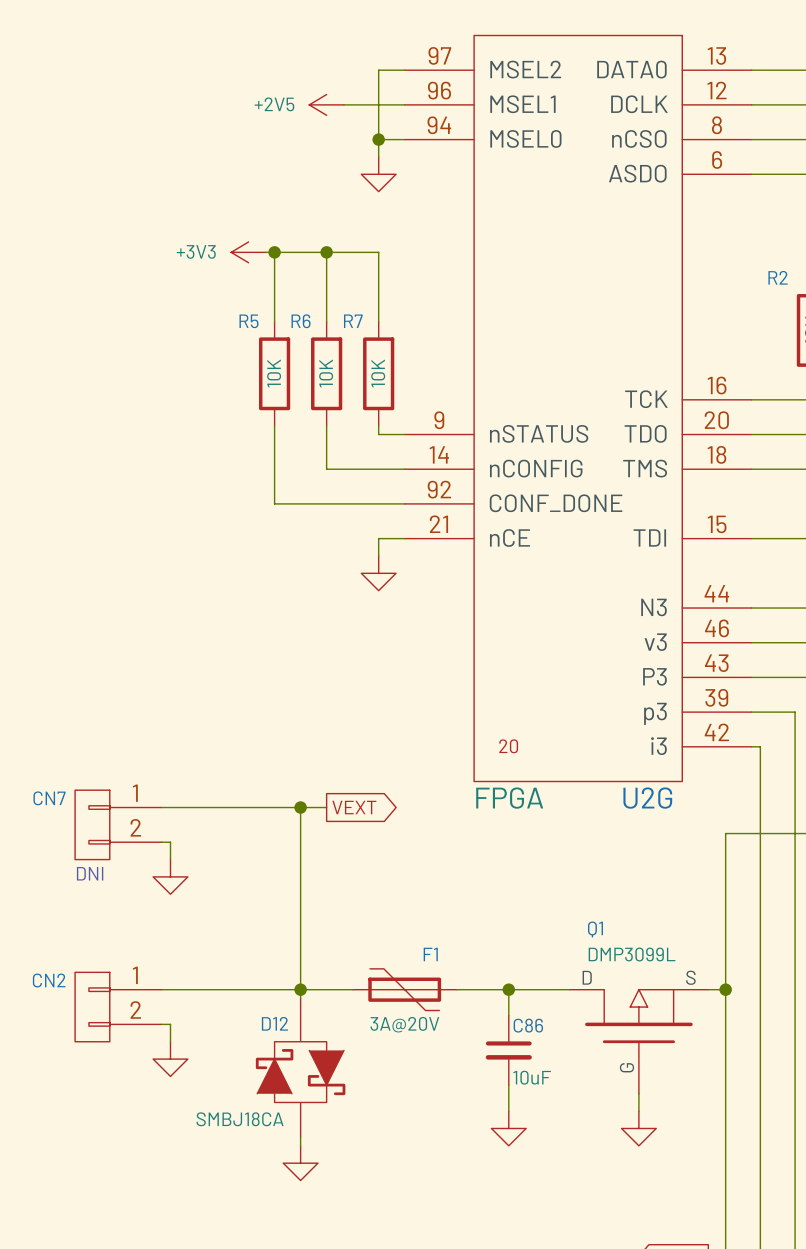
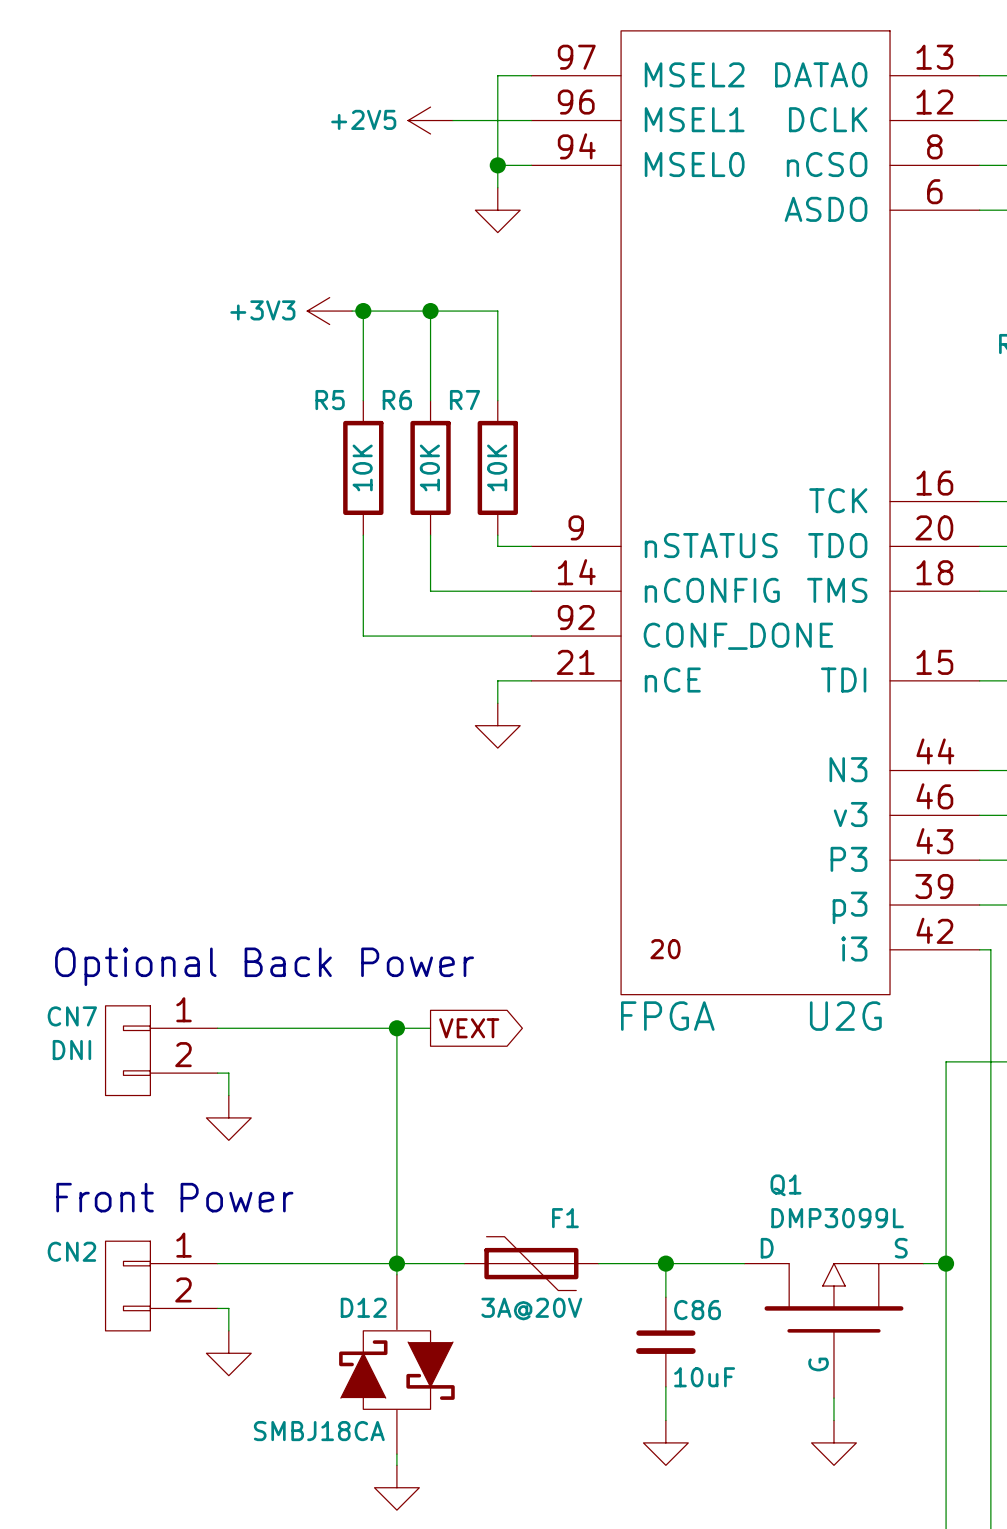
text: none -> Optional Back Power (264, 966)
CN7 text: none -> DNI (71, 1050)
text: DNI (90, 873) -> none
text: none -> Front Power (174, 1197)

